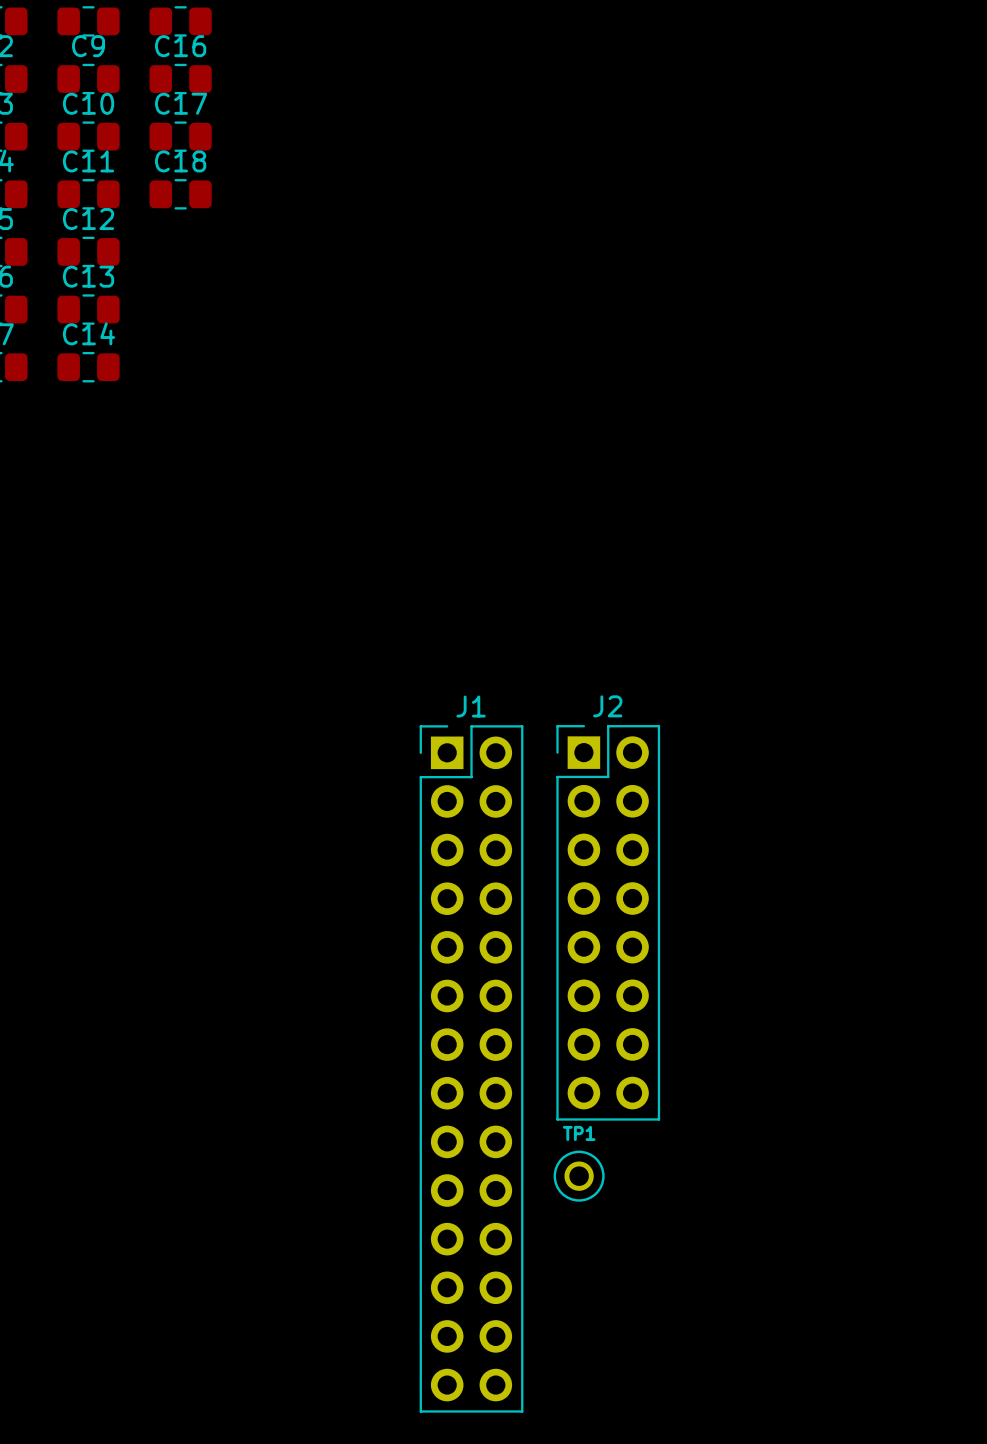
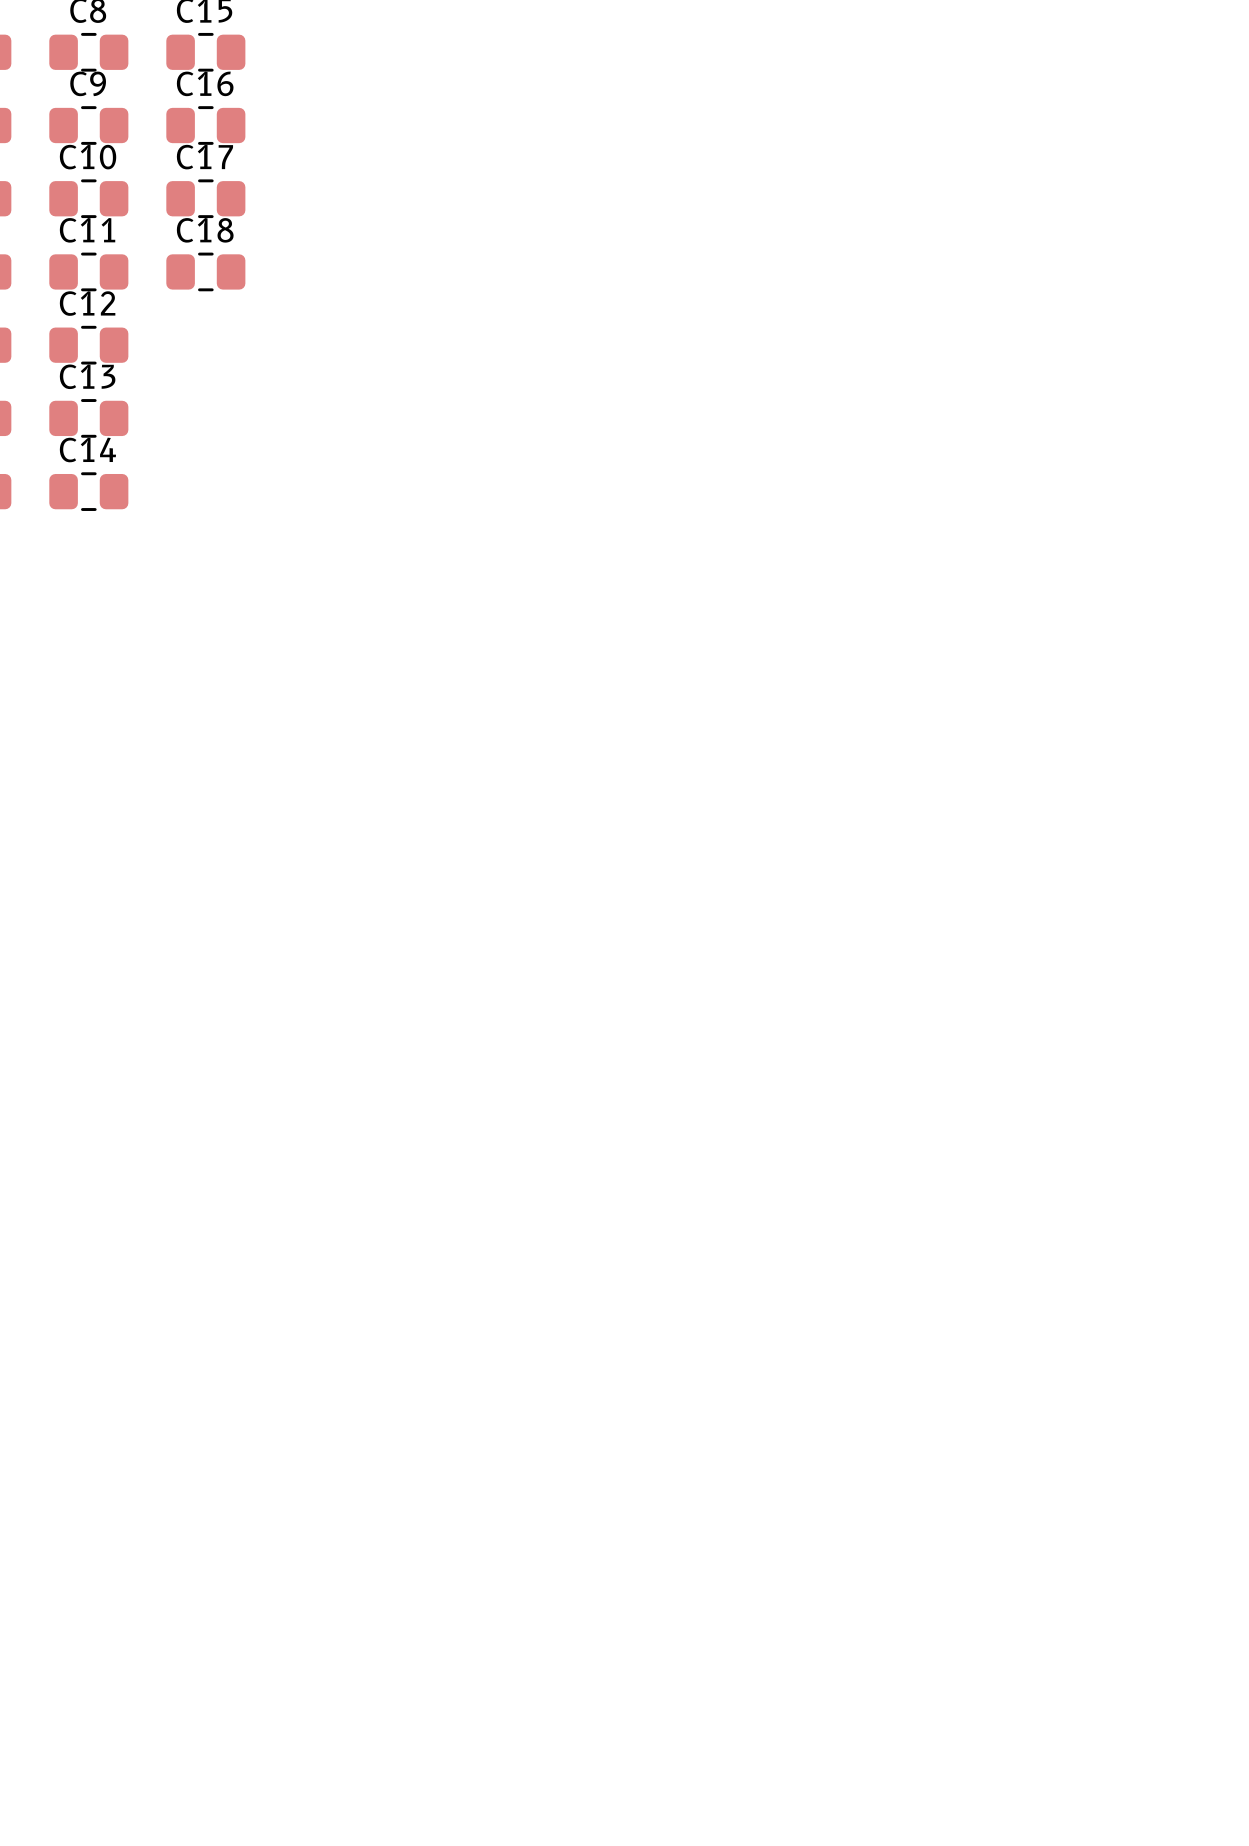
J2: (608, 922) -> none
J1: (471, 1068) -> none
TP1: (579, 1176) -> none

